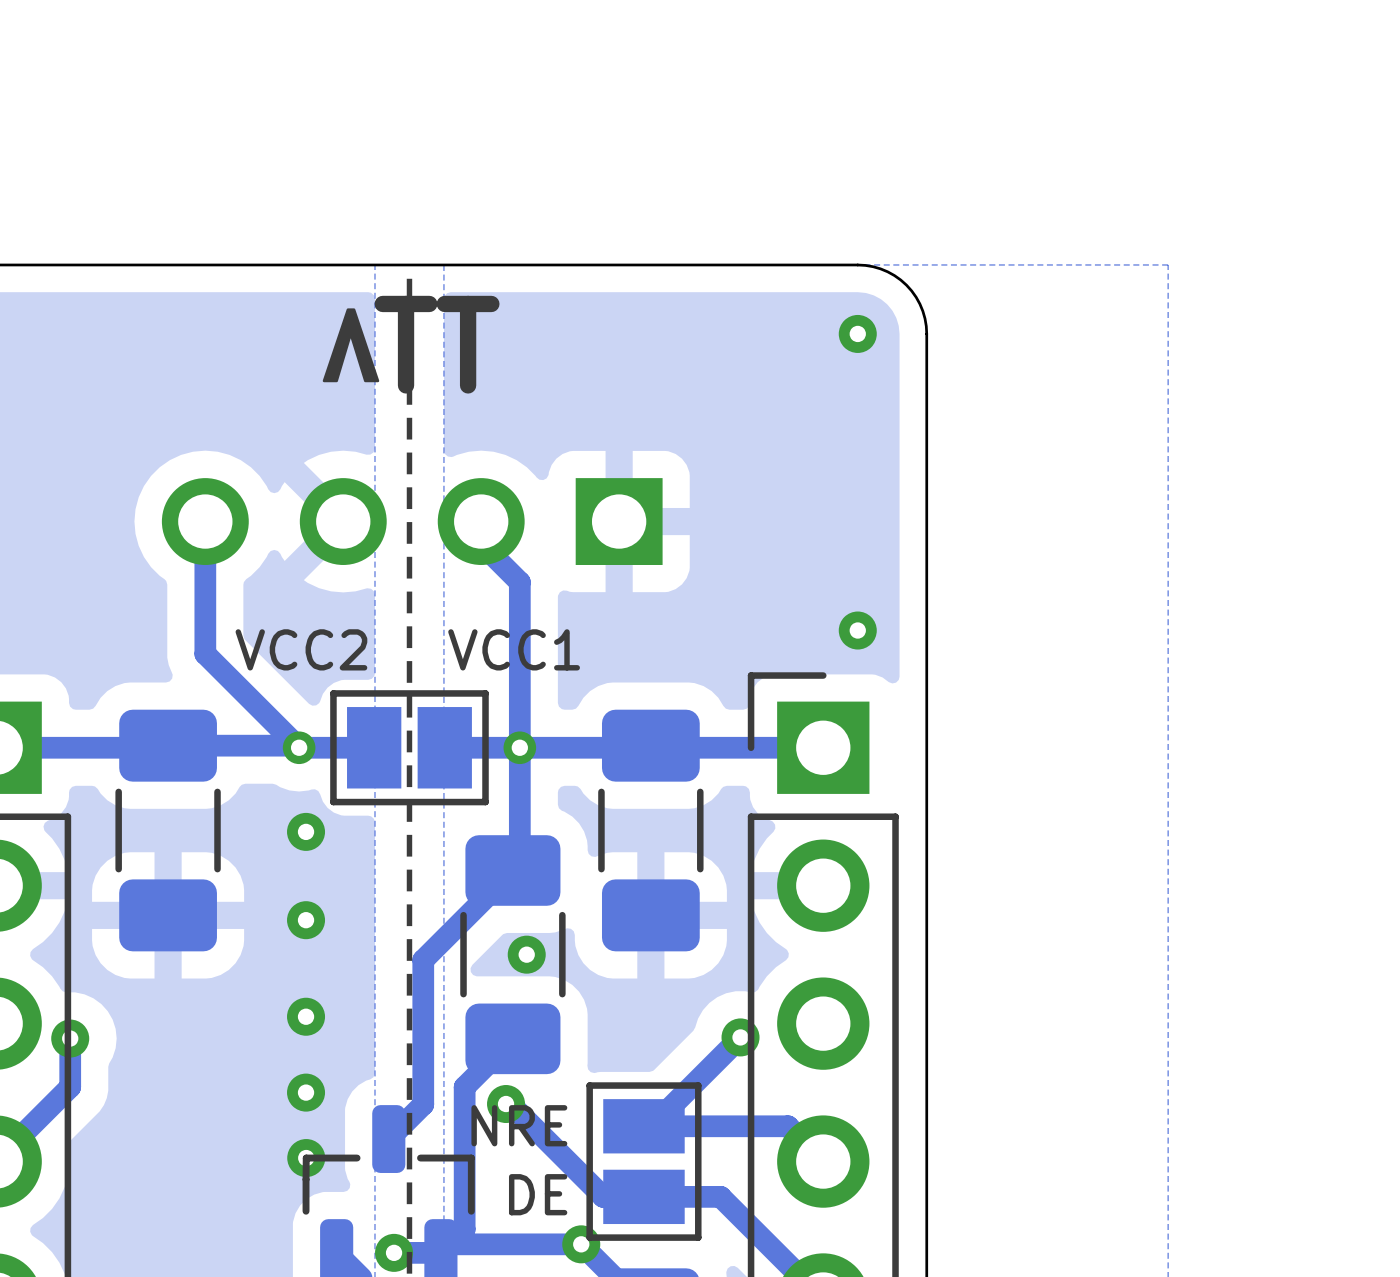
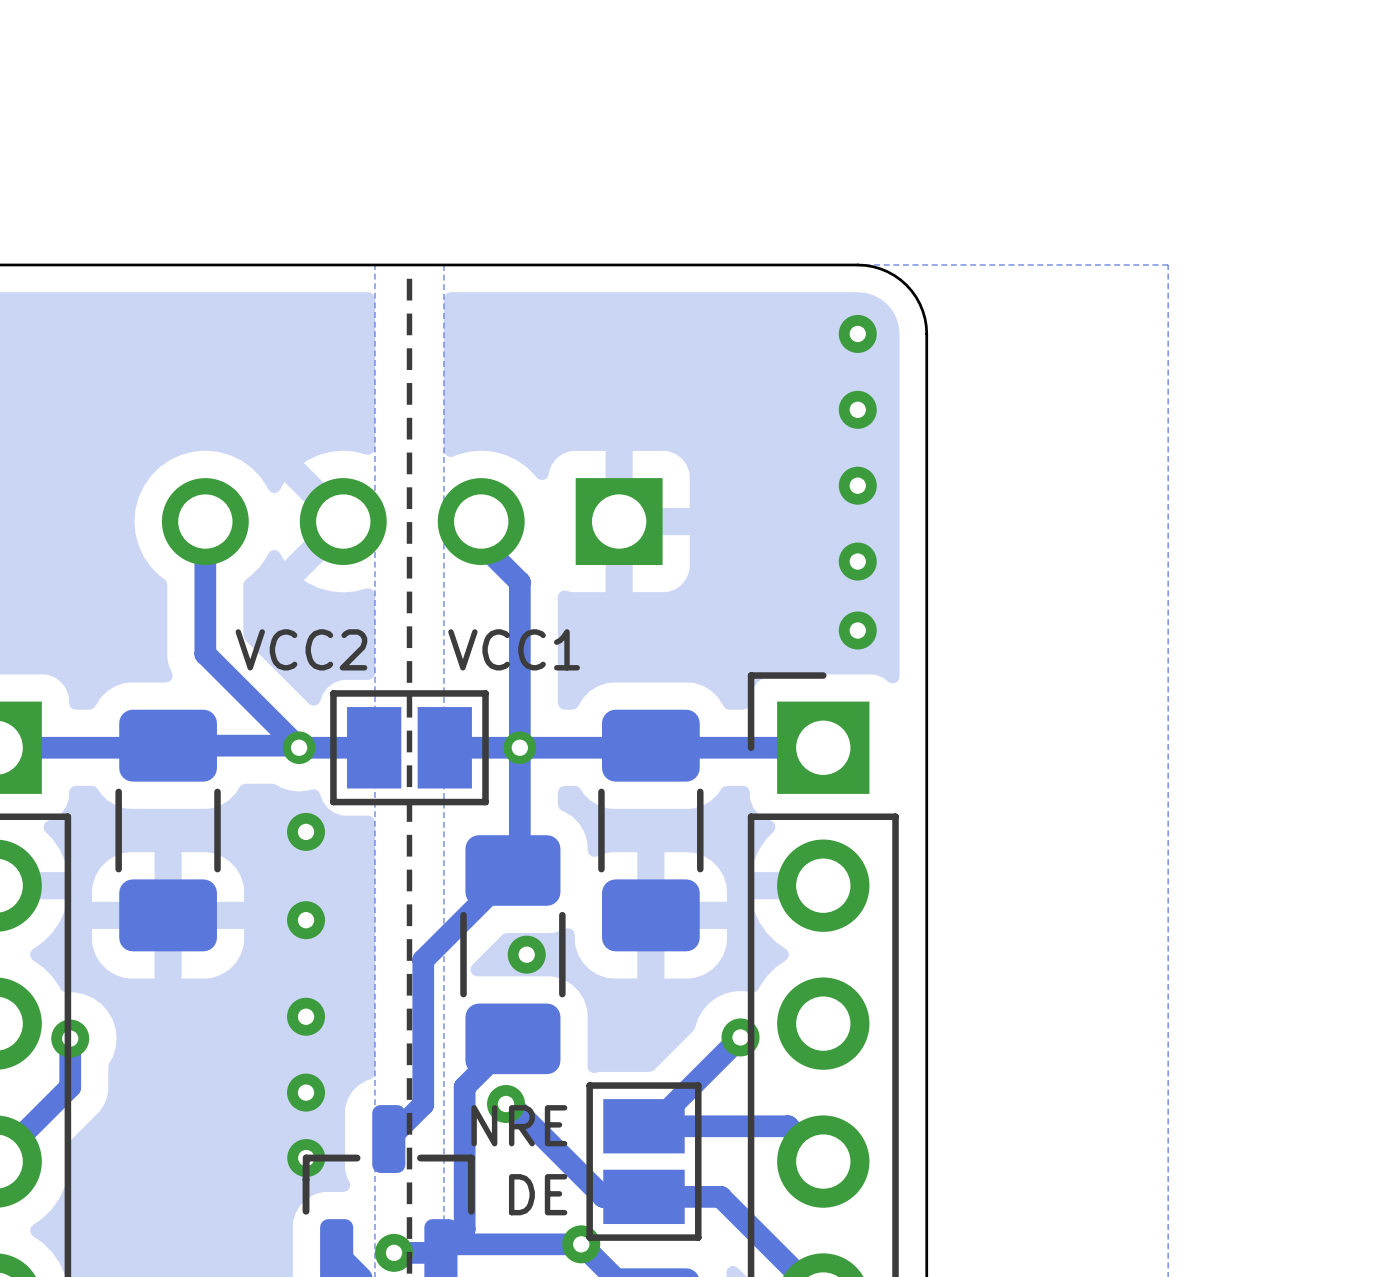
drawing: [322, 308, 380, 383] -> none
text: TT (437, 344) -> none
via: none -> (857, 409)
via: none -> (857, 485)
via: none -> (857, 561)

